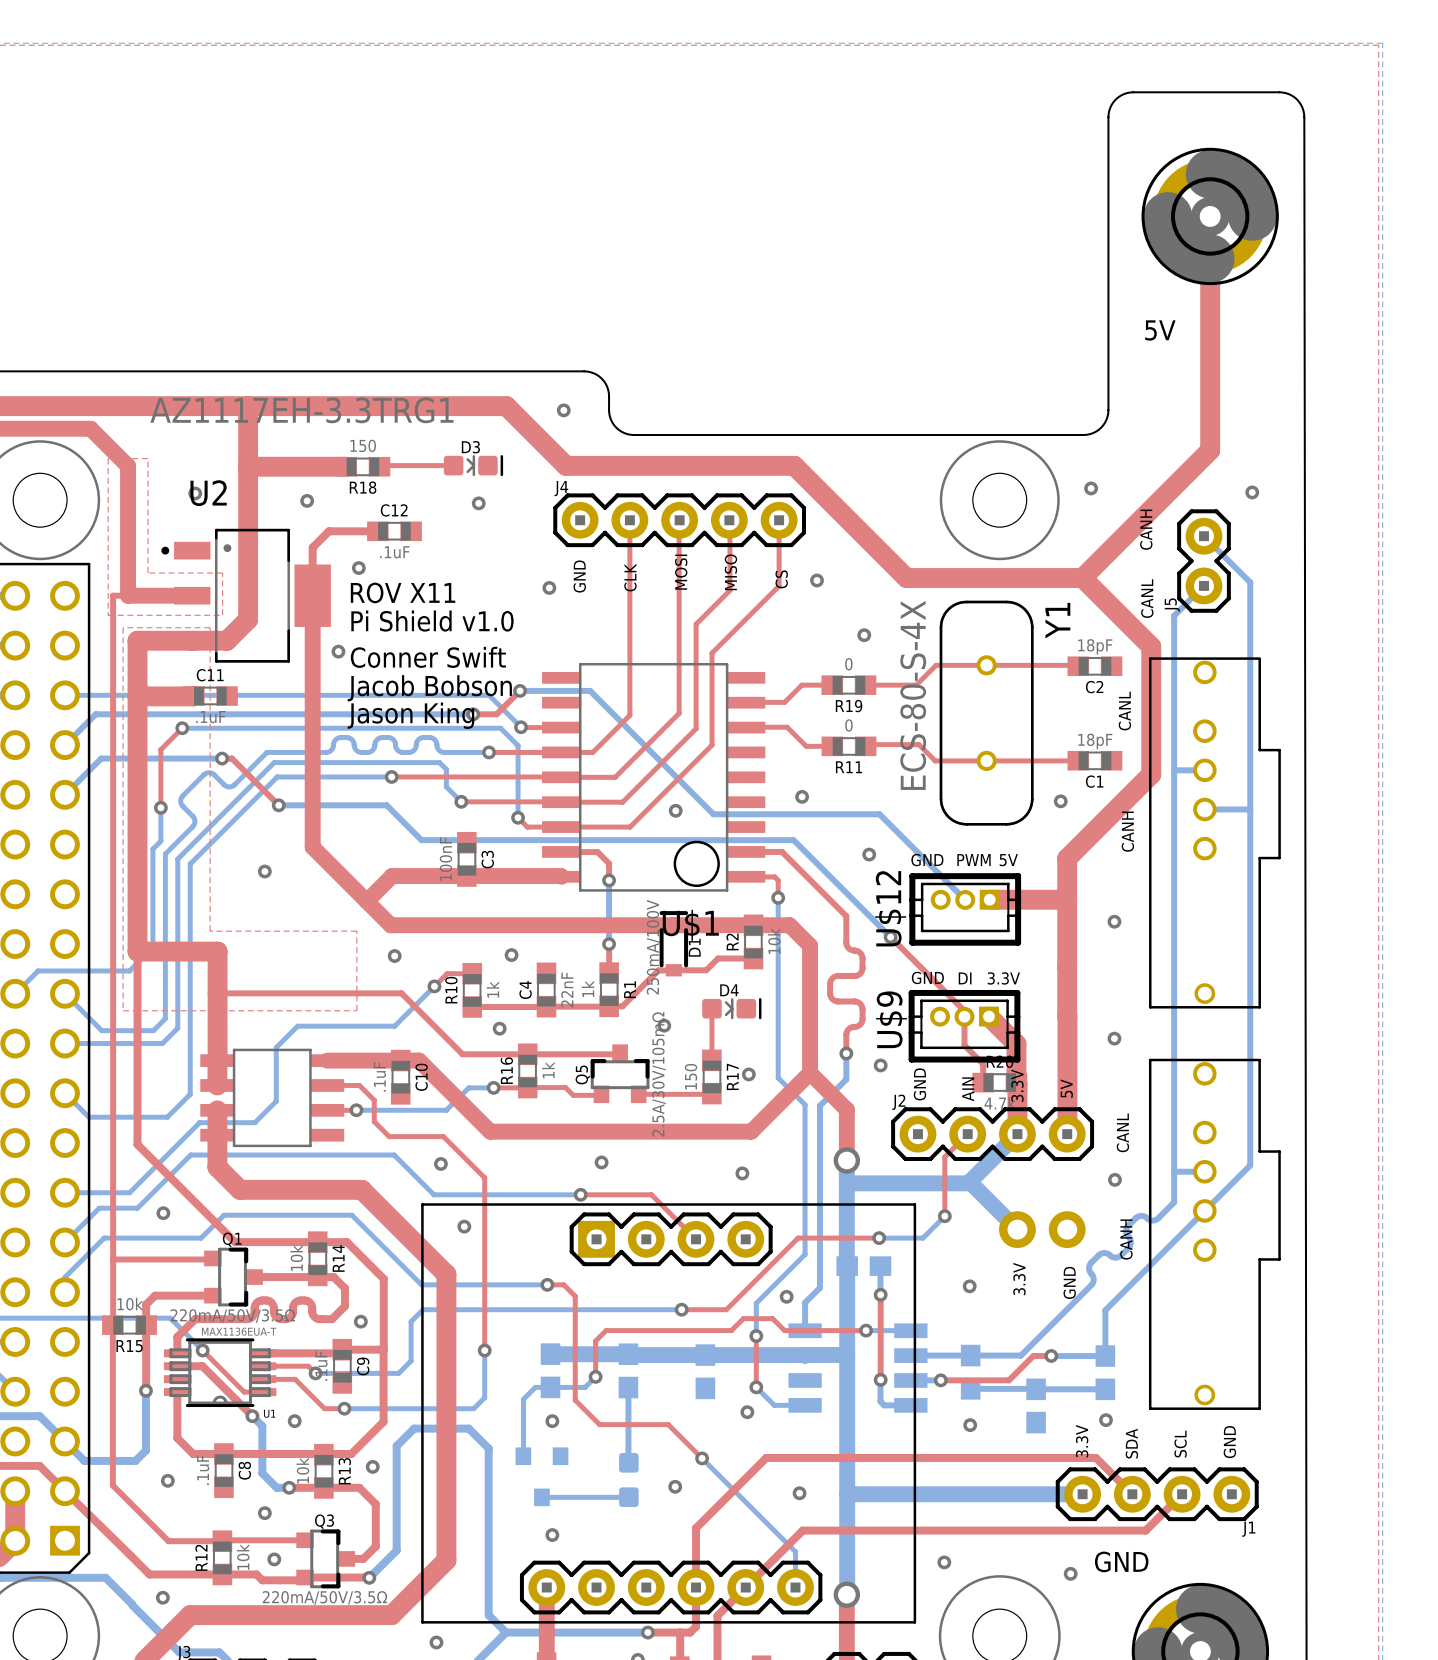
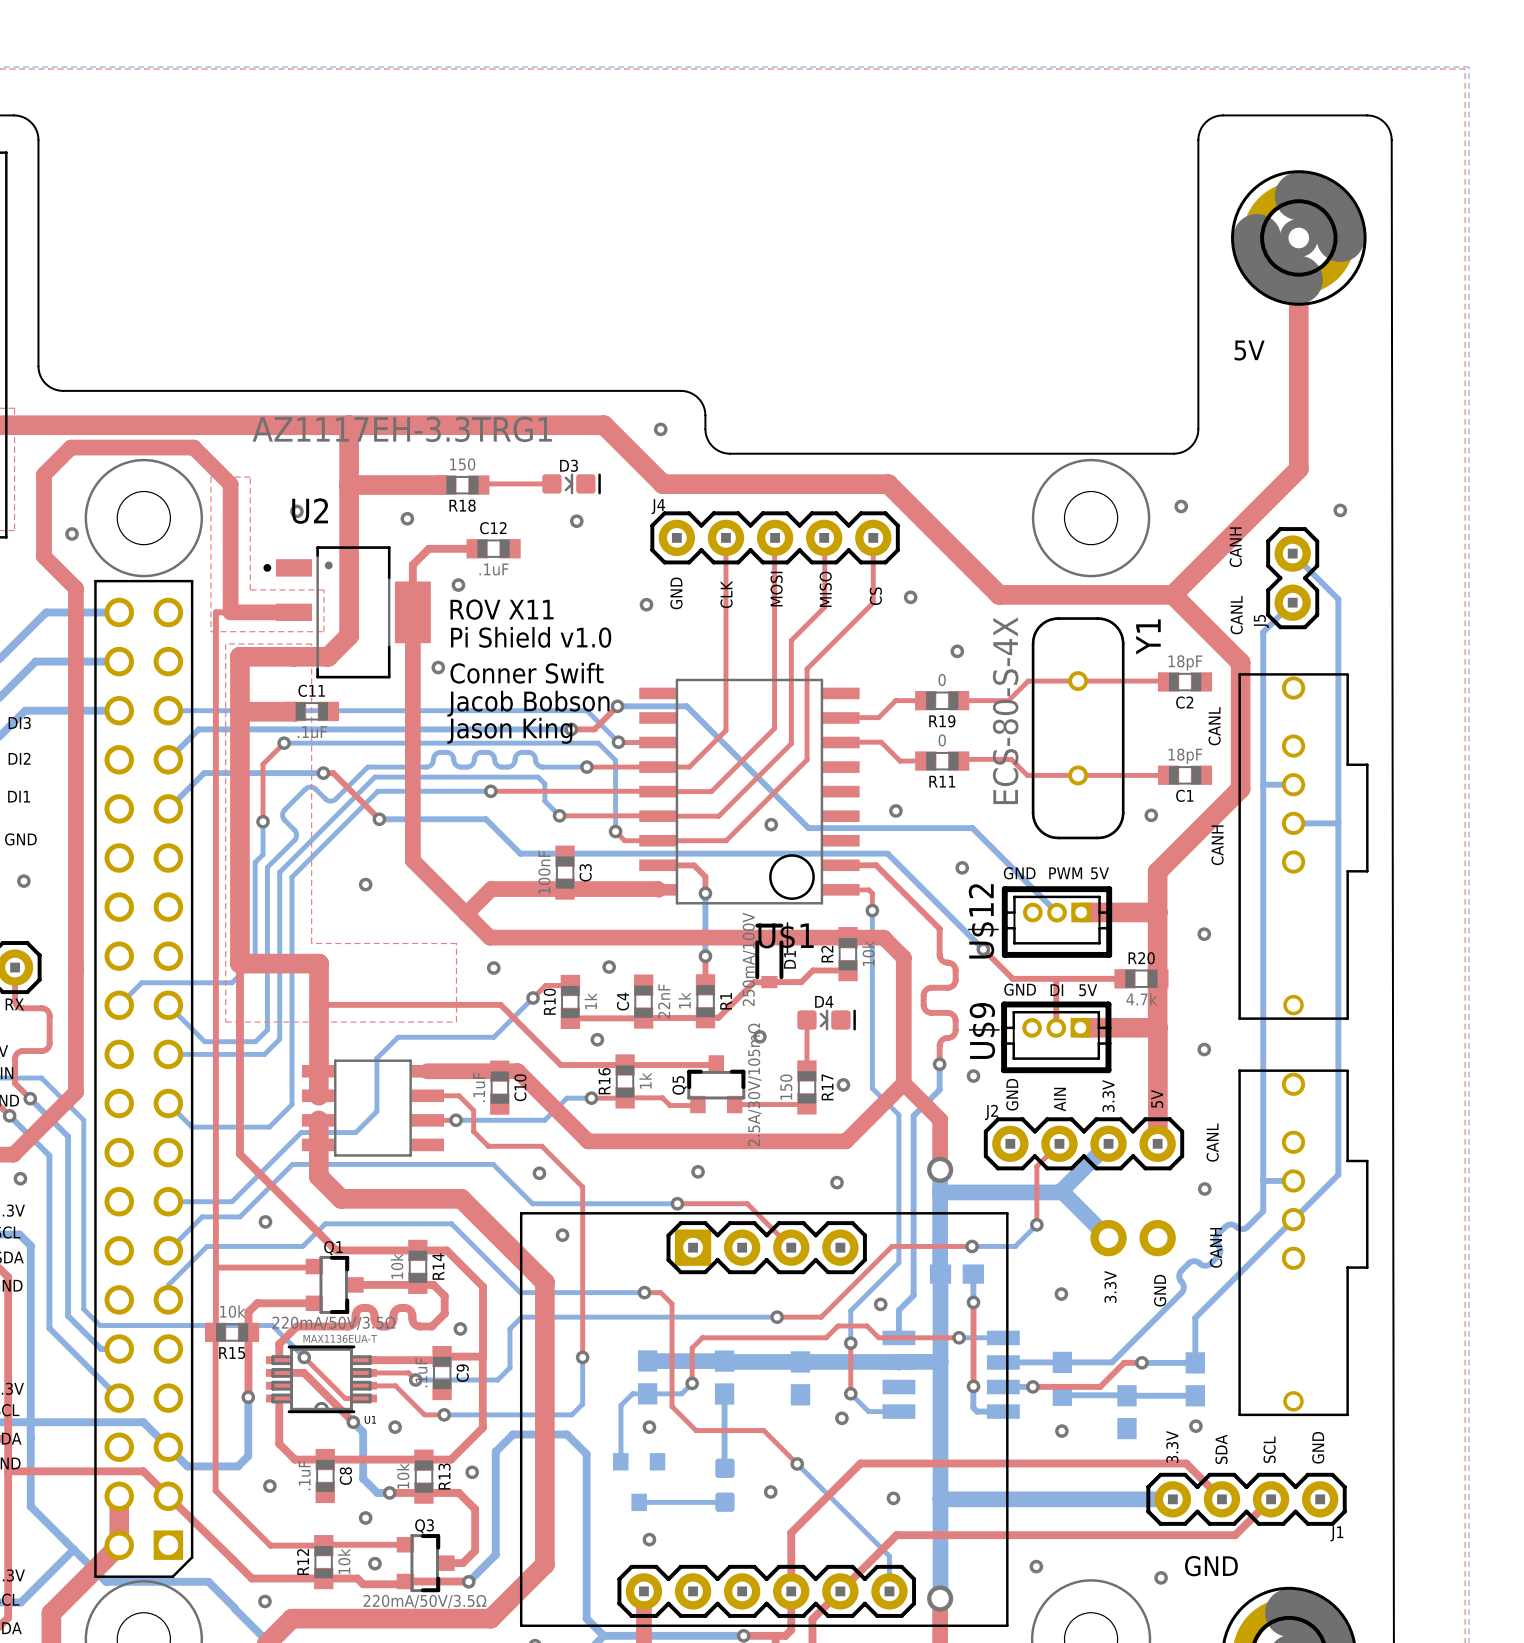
top track: (920, 966) (964, 1011) -> (1012, 978) (1125, 978)
text: 3.3V (1003, 978) -> 5V (1088, 990)
top track: (964, 1016) (964, 1045) (983, 1064) (983, 1082) -> (1056, 1027) (1056, 979)
top track: (988, 1016) (1016, 1044) (1017, 1134) -> (1080, 1027) (1157, 1027)
R20 position: (999, 1082) -> (1141, 978)

